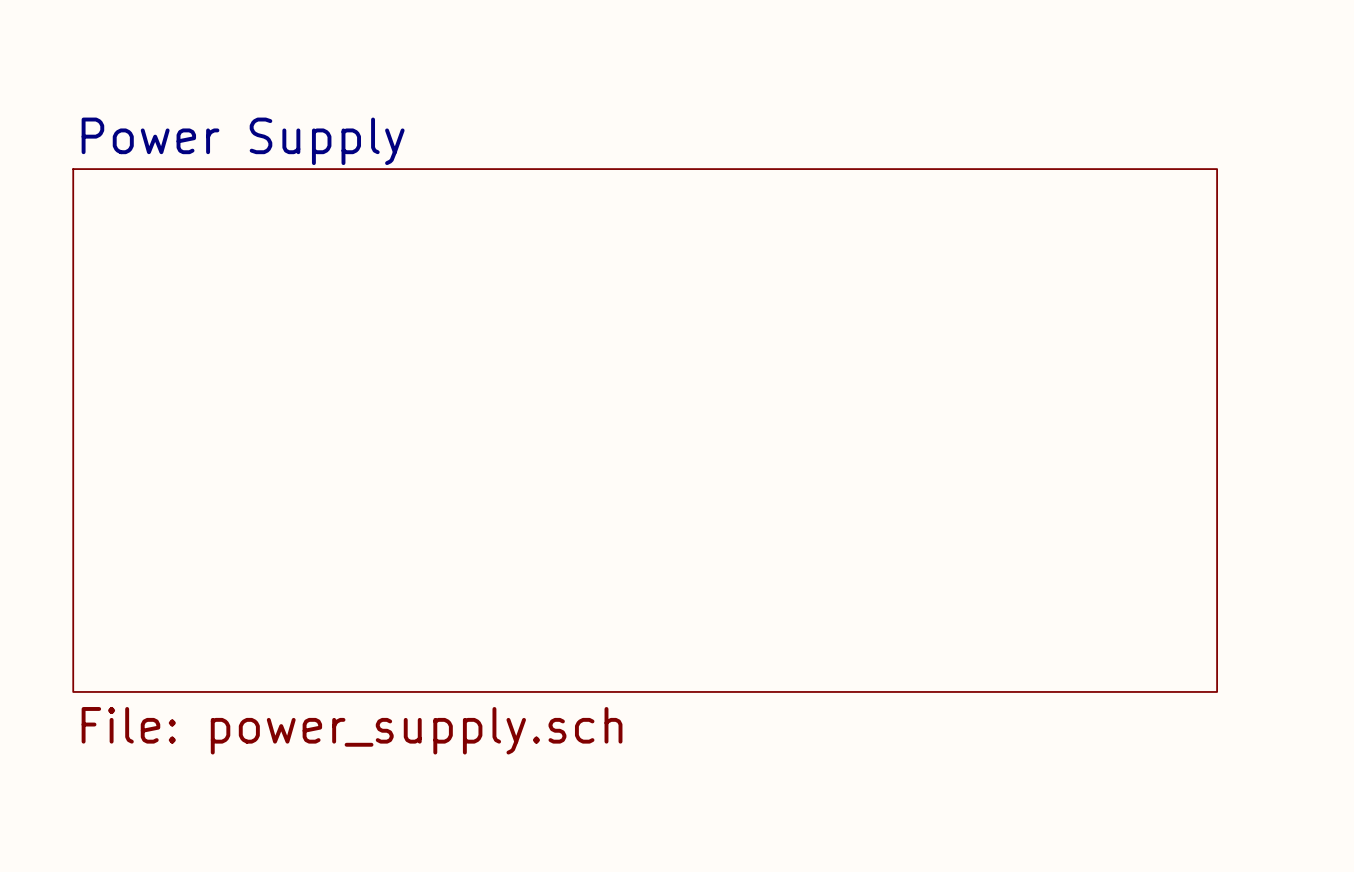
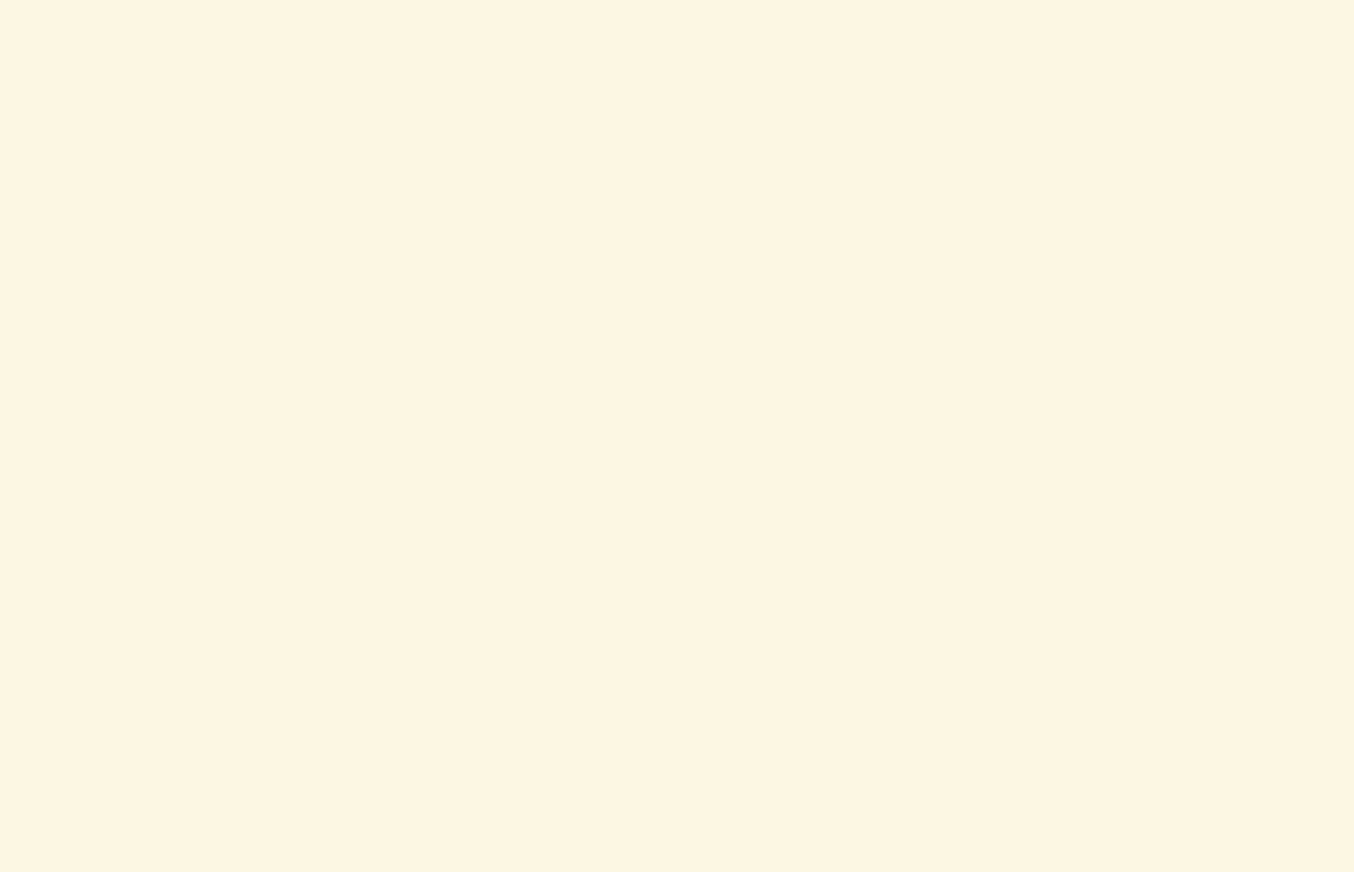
sheet Power Supply: File: power_supply.sch (645, 430) -> none

